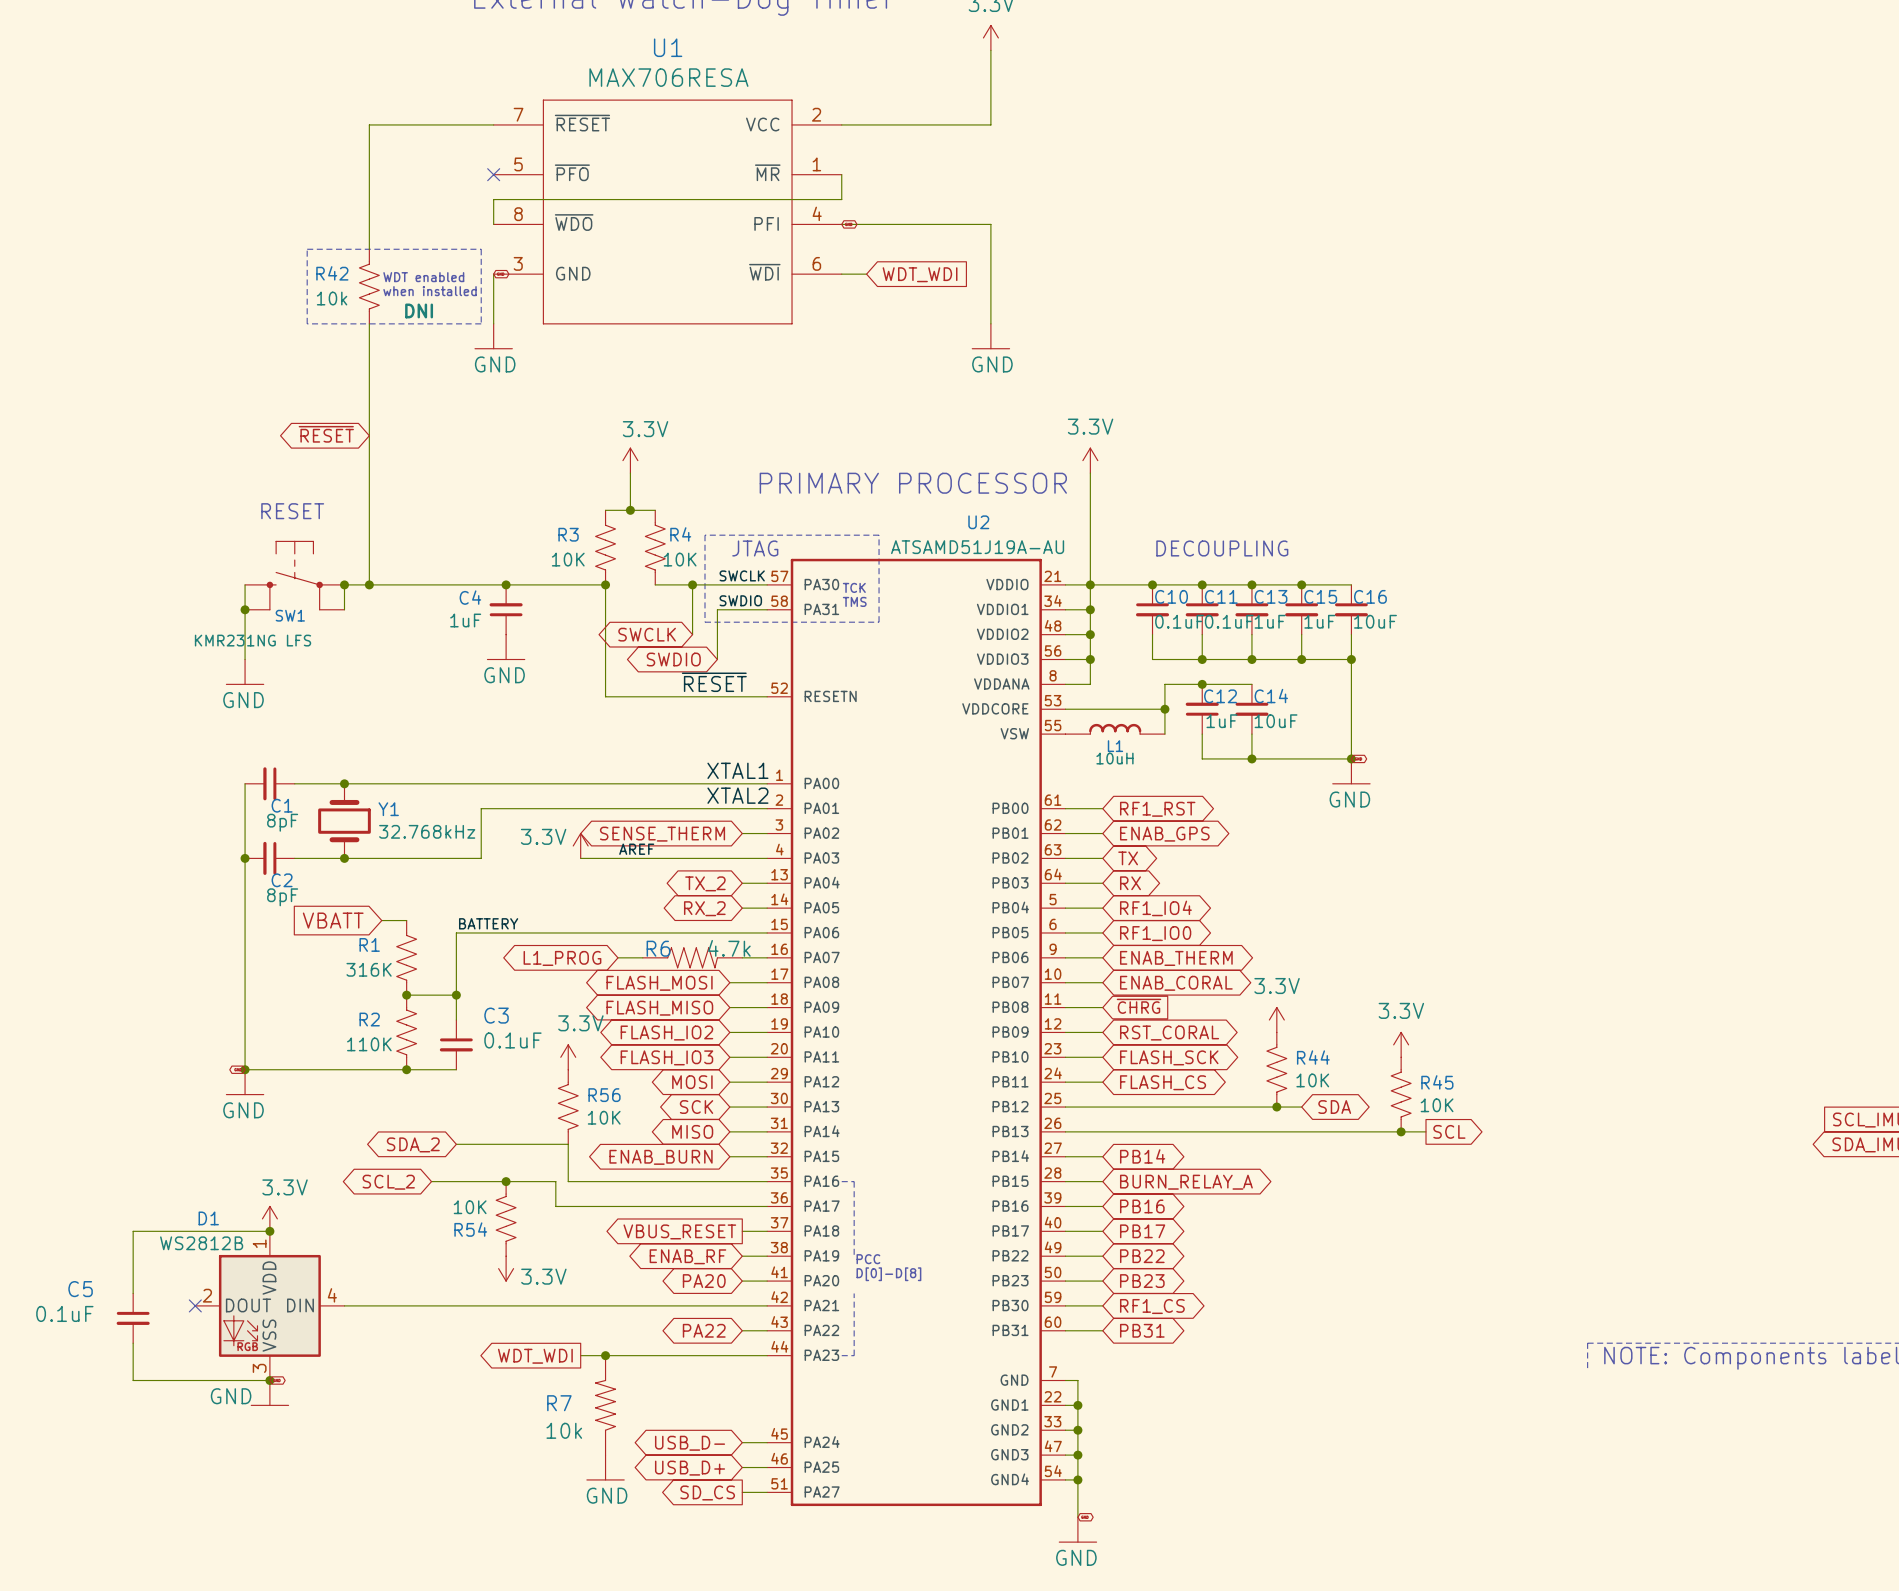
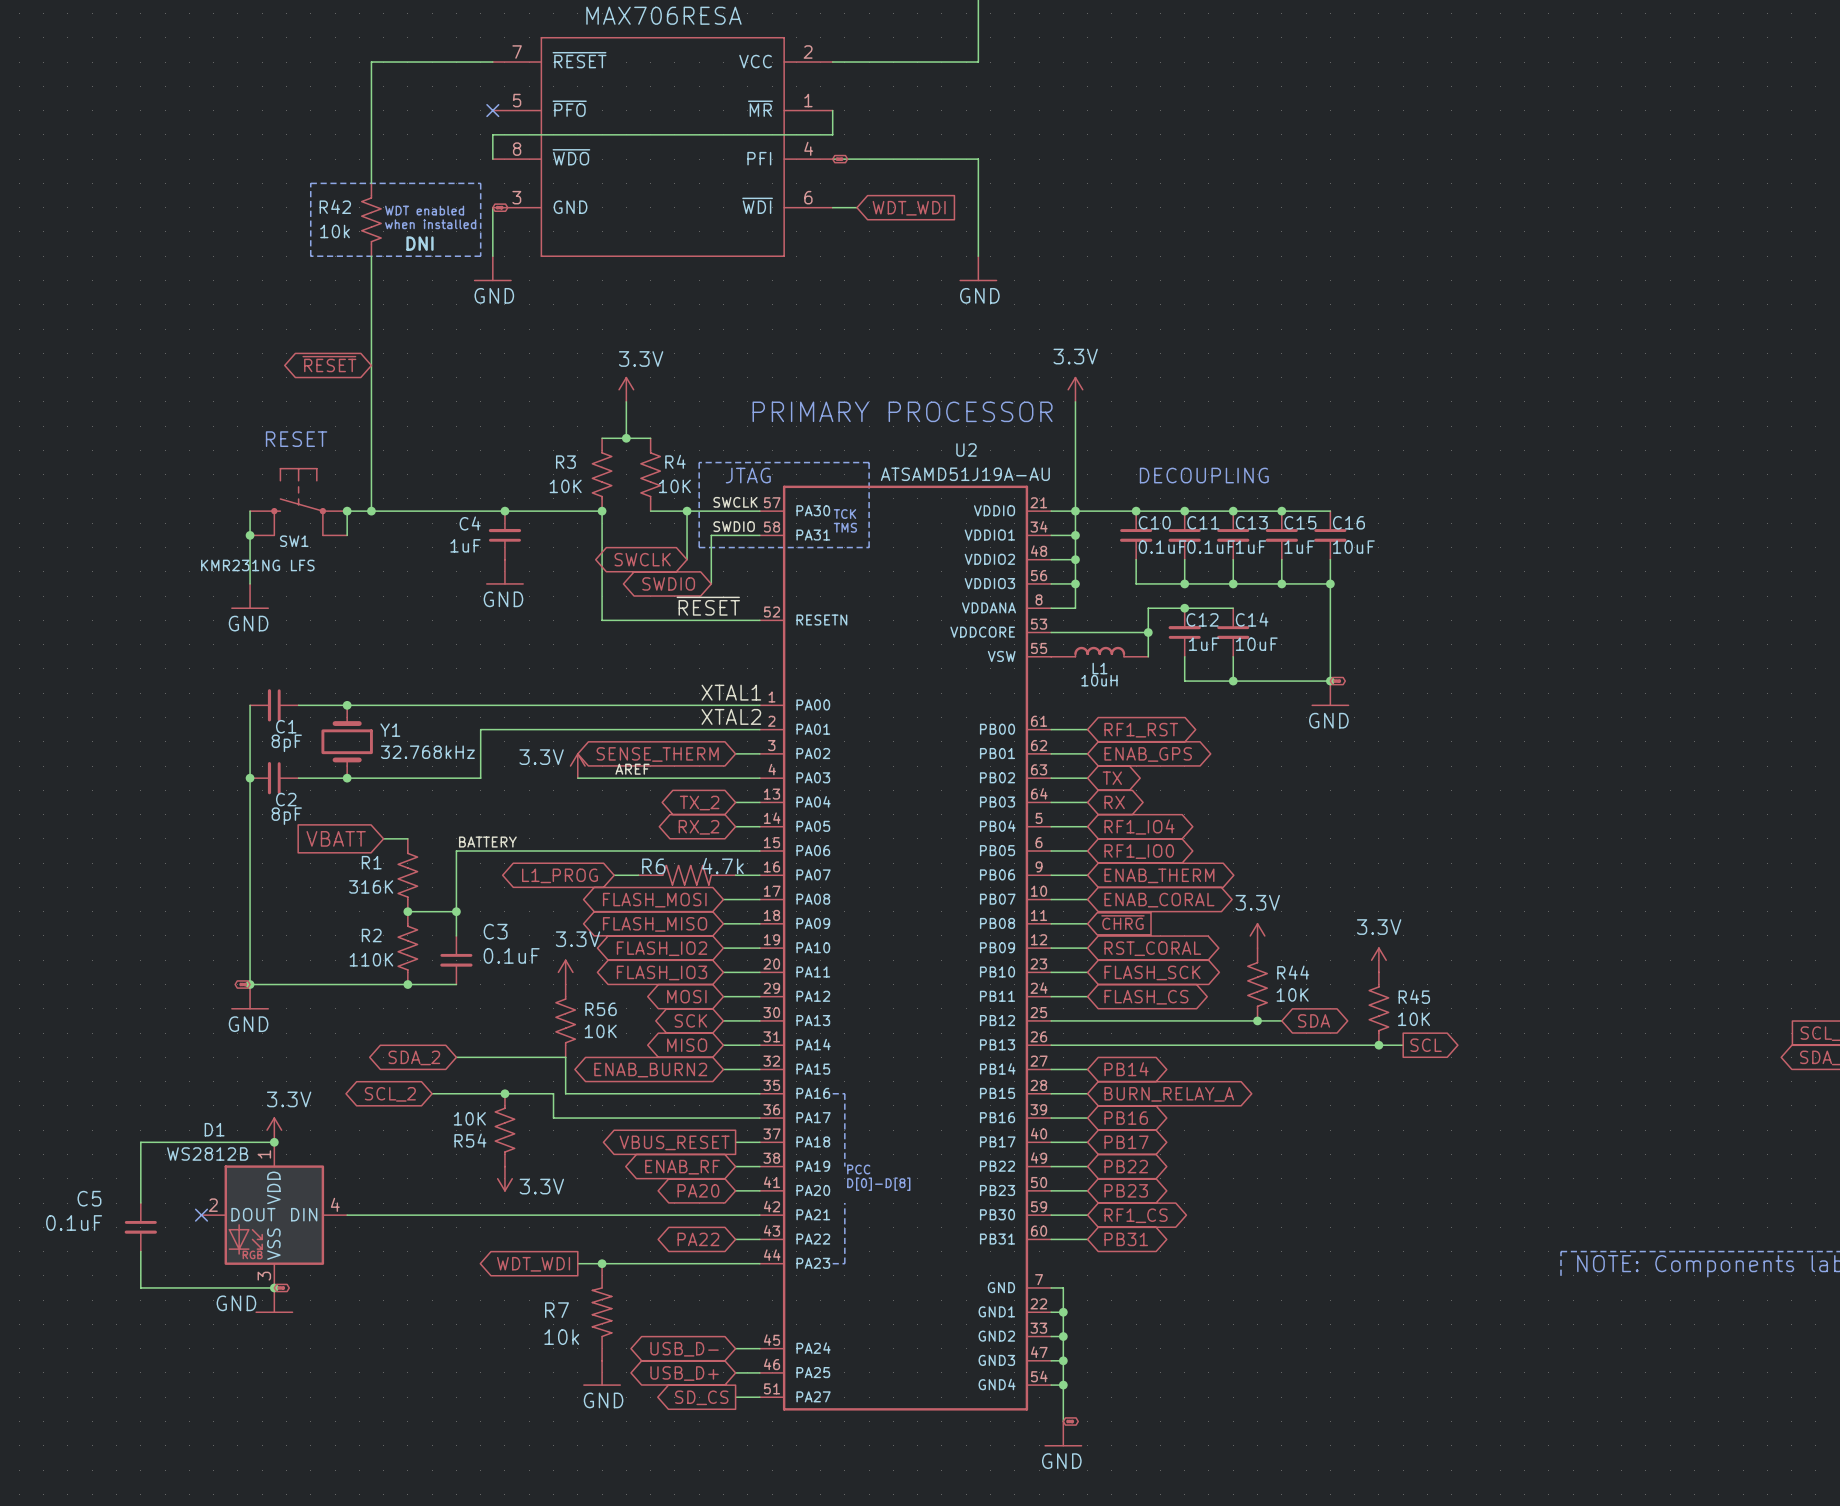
global label: ENAB_BURN (661, 1157) -> ENAB_BURN2 (650, 1070)

